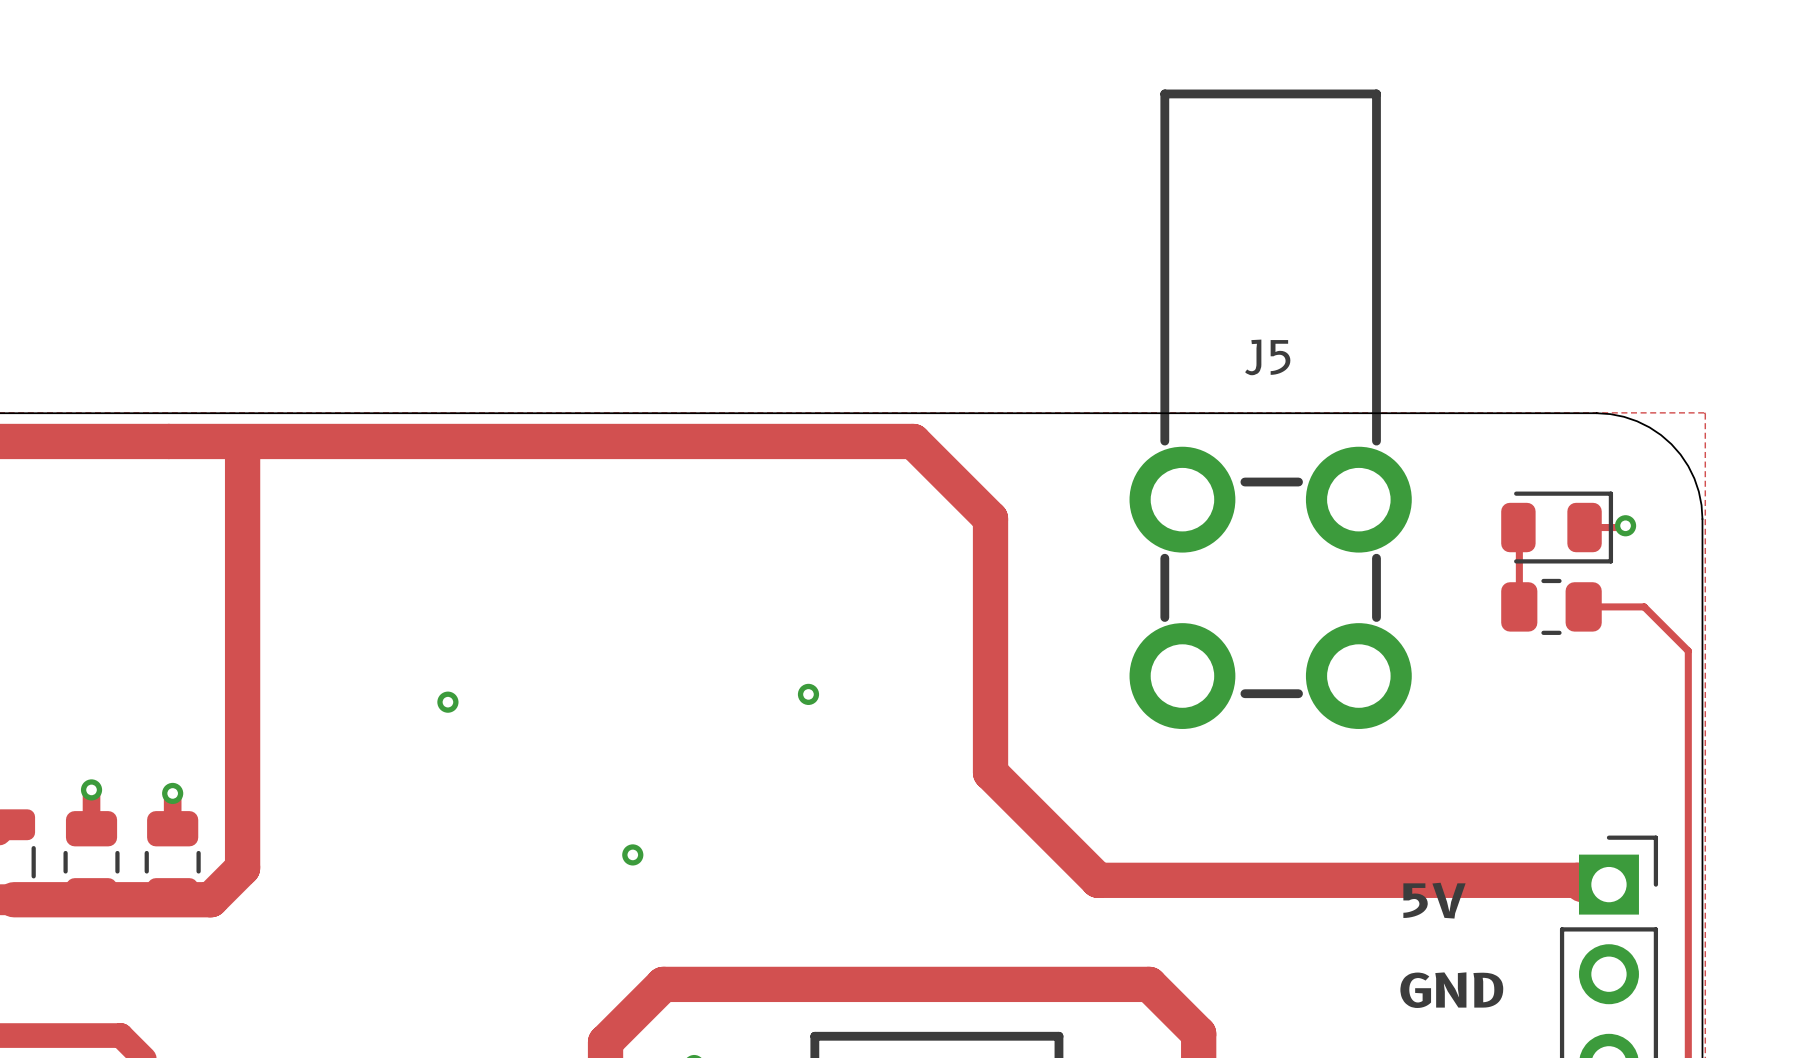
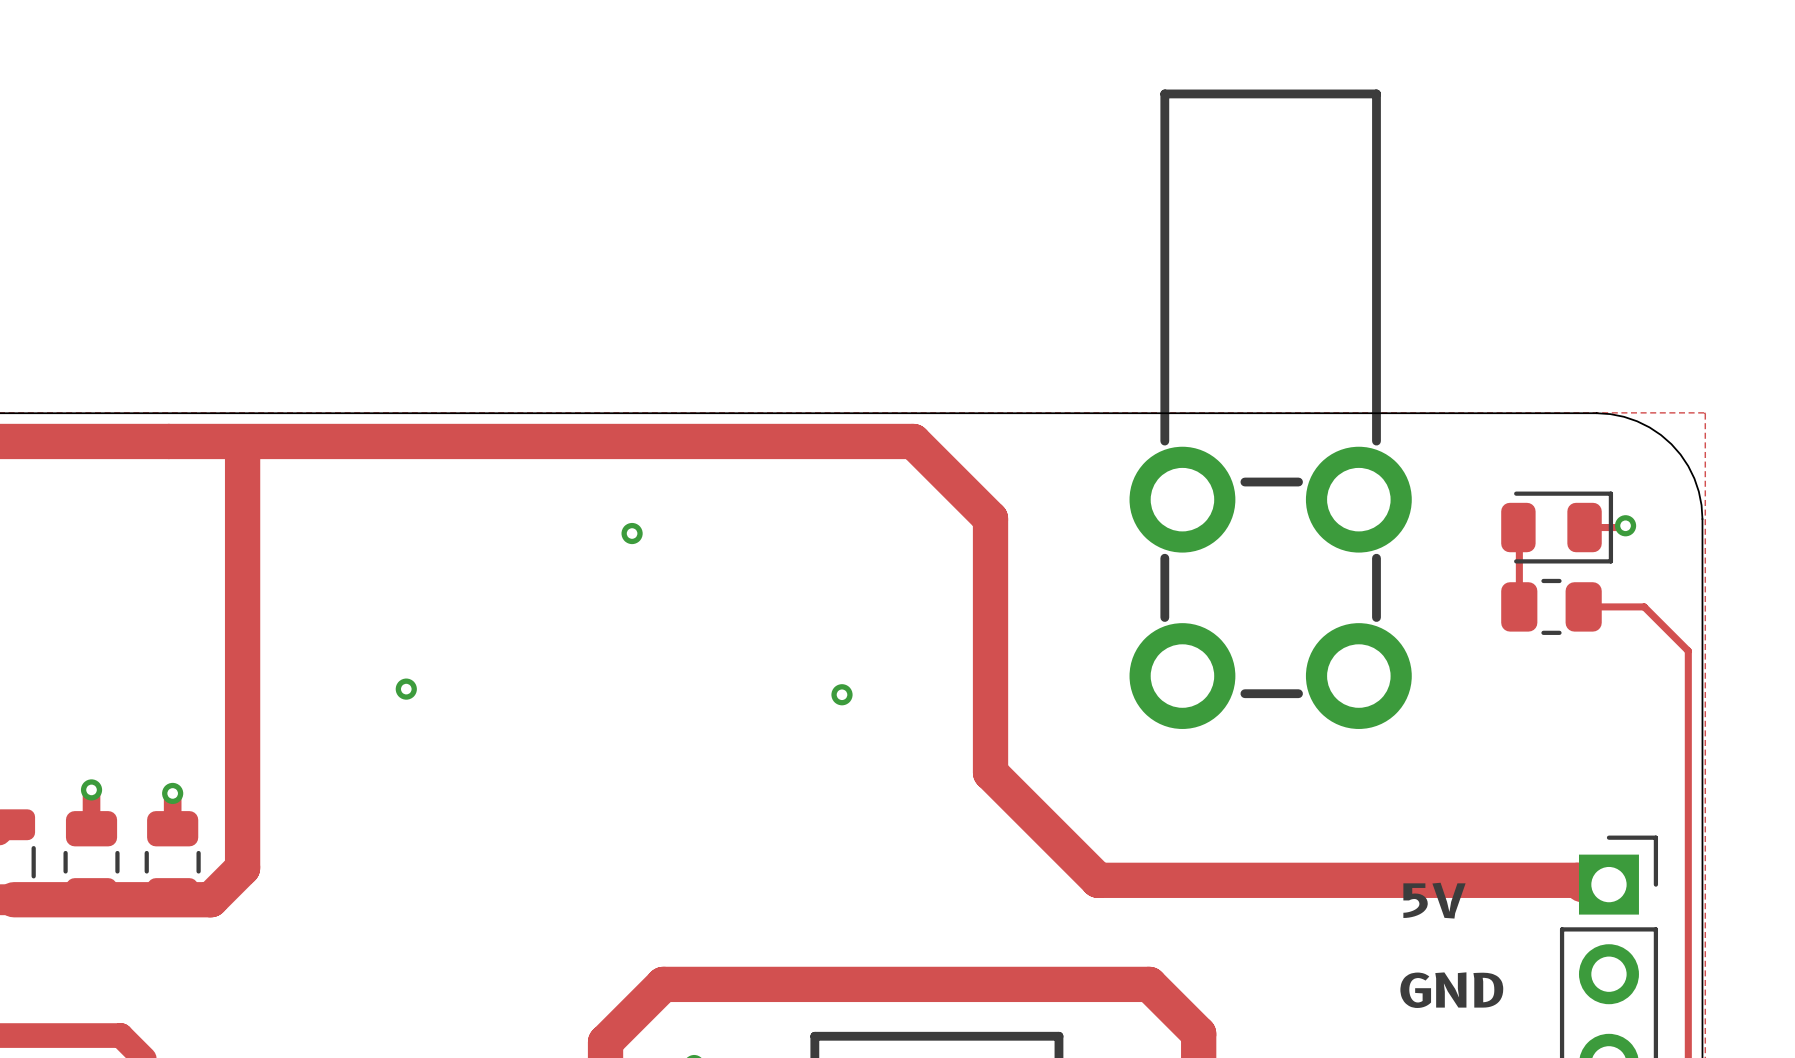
J5 name: J5 (1267, 357) -> none
via: none -> (632, 533)
via position: (808, 694) -> (842, 694)
via position: (447, 702) -> (406, 689)
via: (632, 854) -> none

